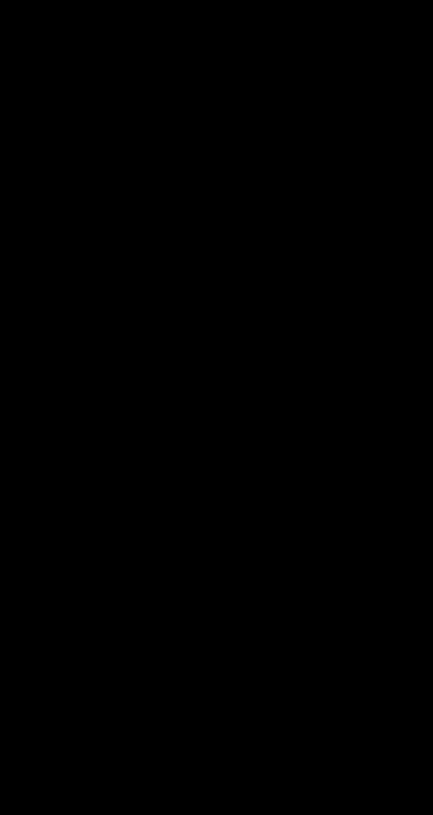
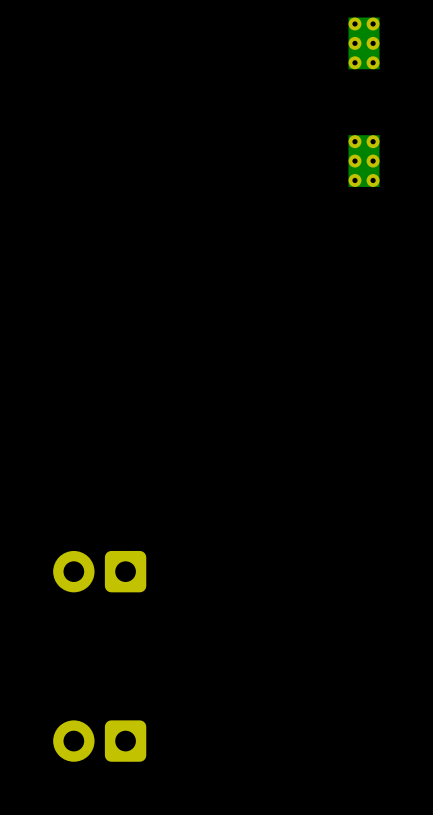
part: none -> (364, 43)
part: none -> (364, 161)
part: none -> (99, 571)
part: none -> (99, 741)

